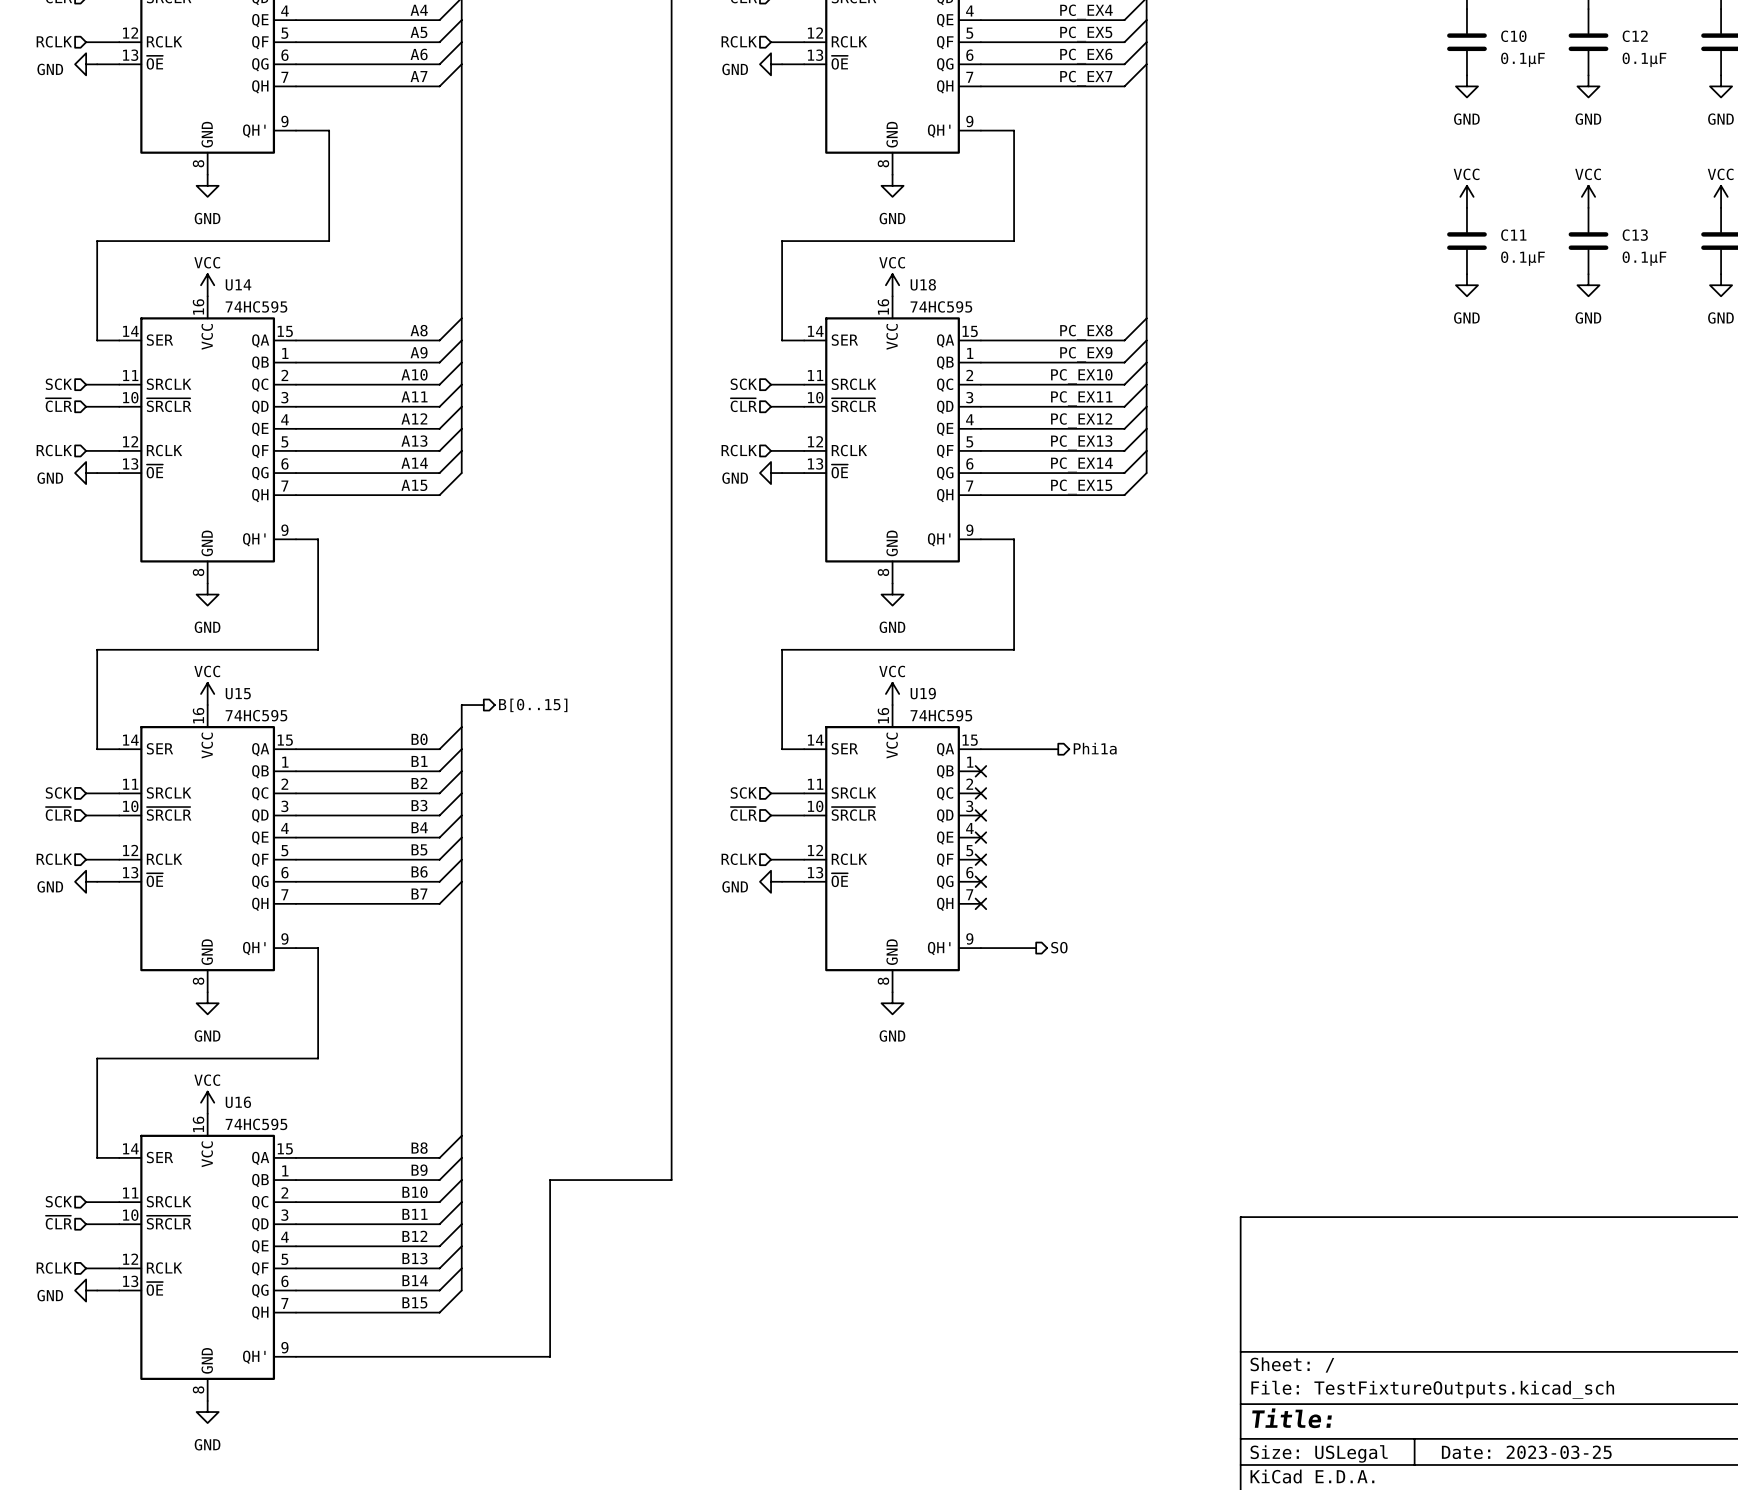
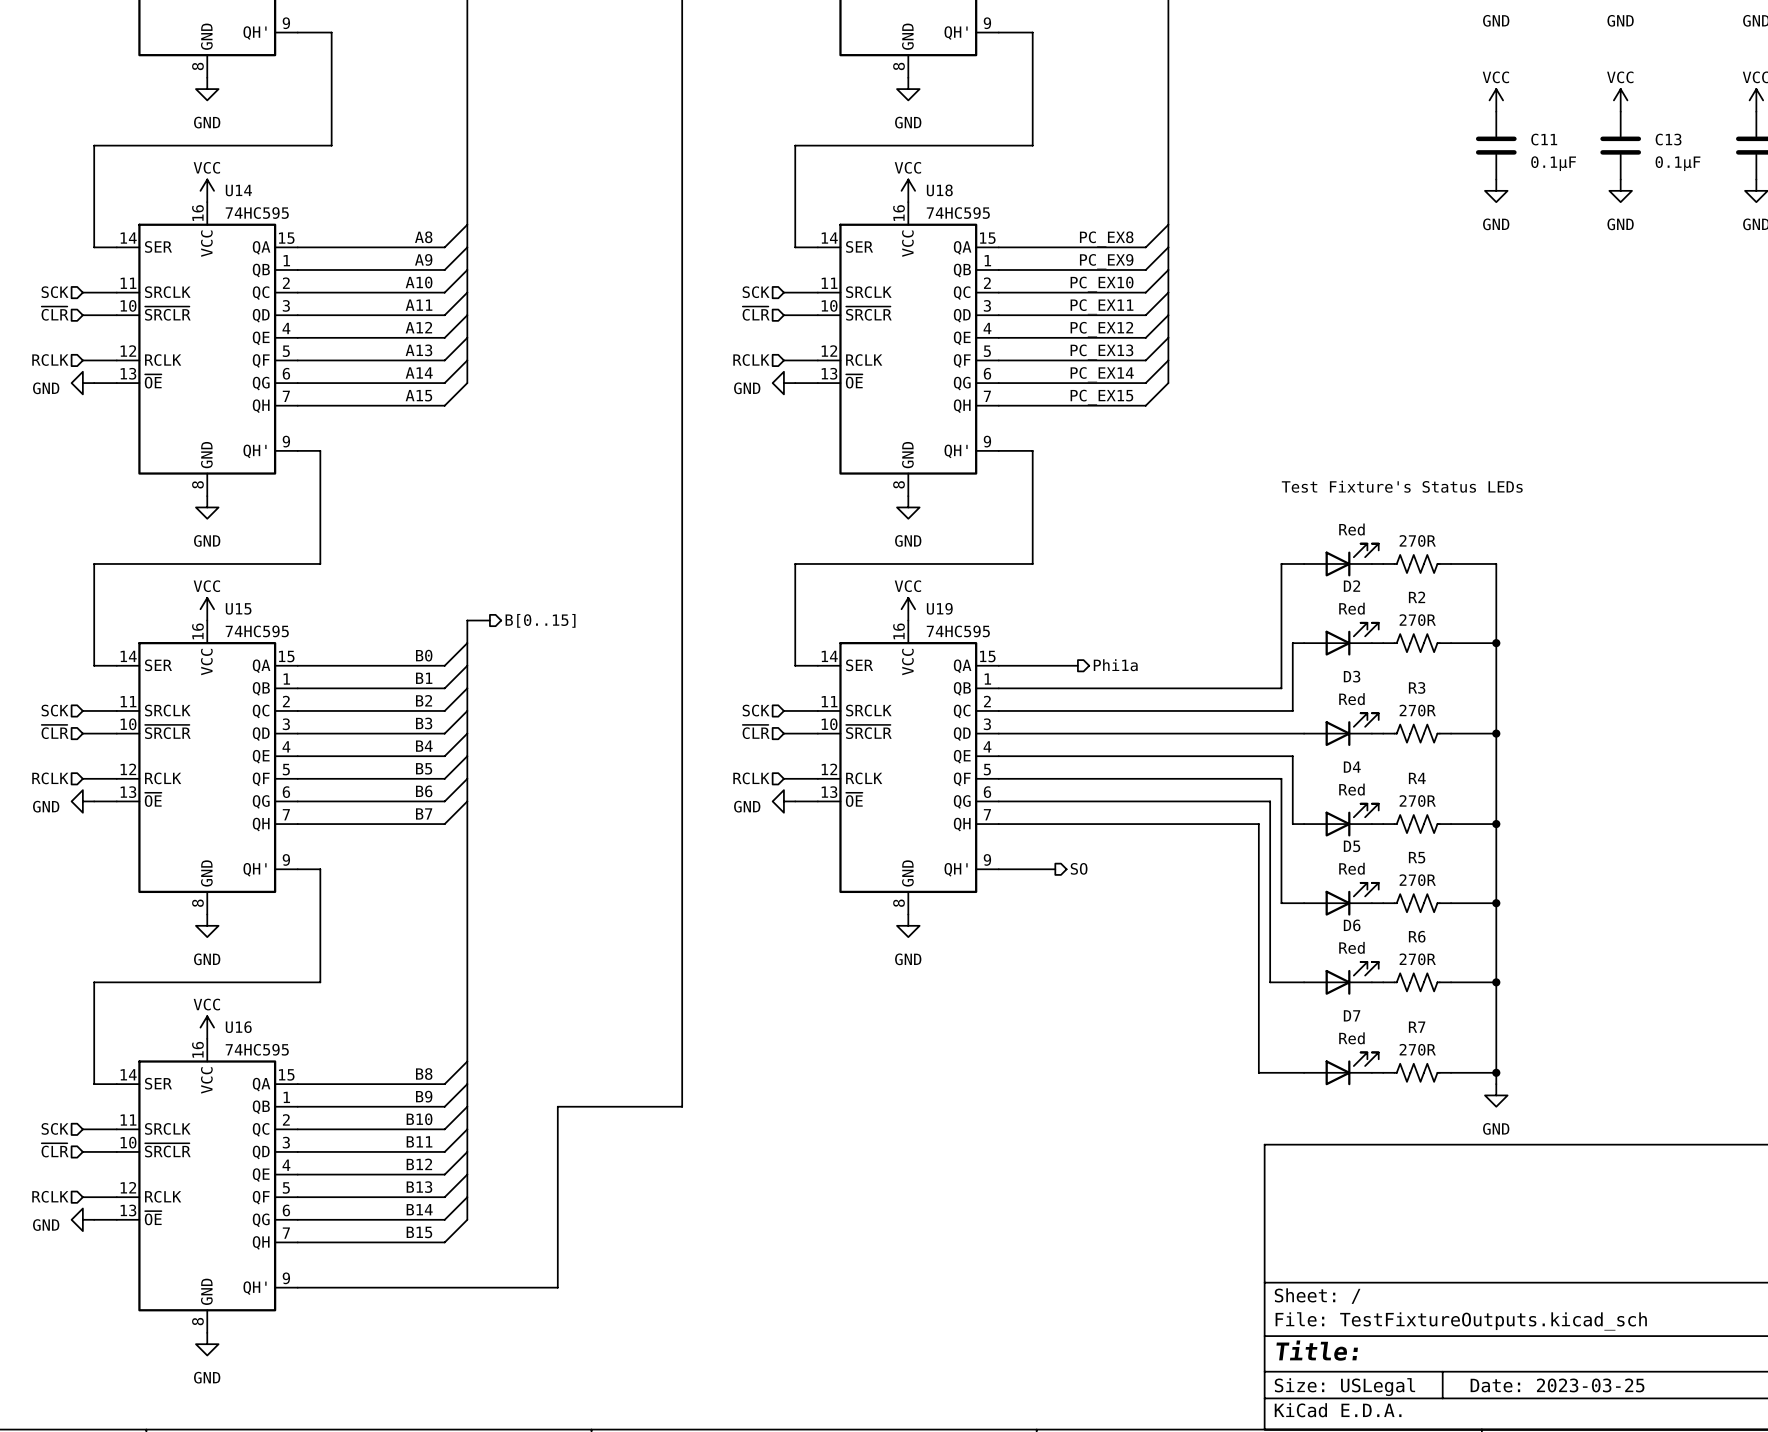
text: none -> Test Fixture's Status LEDs (1402, 486)
part: none -> Red (1341, 560)
wire: none -> (1304, 563) (1281, 563) (1281, 688) (998, 688)
wire: none -> (1371, 563) (1383, 563)
part: none -> 270R (1417, 563)
wire: none -> (1451, 563) (1496, 563) (1496, 1084)
D2: none -> Red (1341, 639)
wire: none -> (1304, 643) (1292, 643) (1292, 710) (998, 710)
wire: none -> (1371, 643) (1383, 643)
R2: none -> 270R (1417, 643)
wire: none -> (1451, 643) (1496, 643)
junction: none -> (1496, 643)
no-connect mark: (980, 771) -> none
no-connect mark: (980, 793) -> none
D3: none -> Red (1341, 729)
wire: none -> (998, 733) (1304, 733)
no-connect mark: (980, 815) -> none
wire: none -> (1371, 733) (1383, 733)
R3: none -> 270R (1417, 733)
wire: none -> (1451, 733) (1496, 733)
junction: none -> (1496, 733)
wire: none -> (998, 756) (1292, 756) (1292, 824) (1304, 824)
no-connect mark: (980, 837) -> none
wire: none -> (998, 778) (1281, 778) (1281, 903) (1304, 903)
no-connect mark: (980, 859) -> none
wire: none -> (998, 801) (1270, 801) (1270, 982) (1304, 982)
no-connect mark: (980, 881) -> none
D4: none -> Red (1341, 820)
wire: none -> (998, 824) (1258, 824) (1258, 1072) (1304, 1072)
no-connect mark: (980, 903) -> none
wire: none -> (1371, 824) (1383, 824)
R4: none -> 270R (1417, 824)
wire: none -> (1451, 824) (1496, 824)
junction: none -> (1496, 824)
D5: none -> Red (1341, 899)
wire: none -> (1371, 903) (1383, 903)
R5: none -> 270R (1417, 903)
wire: none -> (1451, 903) (1496, 903)
junction: none -> (1496, 903)
D6: none -> Red (1341, 978)
wire: none -> (1371, 982) (1383, 982)
R6: none -> 270R (1417, 982)
wire: none -> (1451, 982) (1496, 982)
junction: none -> (1496, 982)
D7: none -> Red (1341, 1068)
wire: none -> (1371, 1072) (1383, 1072)
R7: none -> 270R (1417, 1072)
wire: none -> (1451, 1072) (1496, 1072)
junction: none -> (1496, 1072)
power symbol: none -> GND (1496, 1095)

